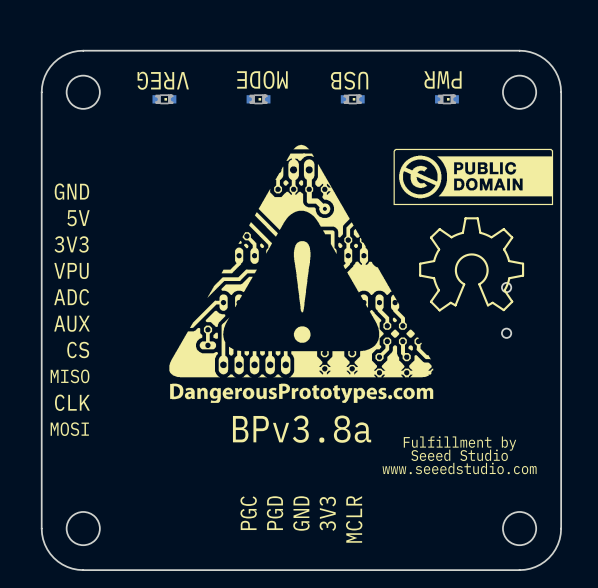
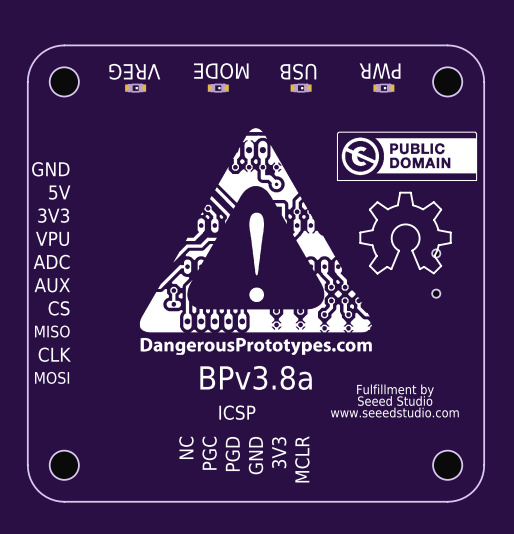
text: none -> ICSP (237, 412)
text: none -> NC (186, 447)

